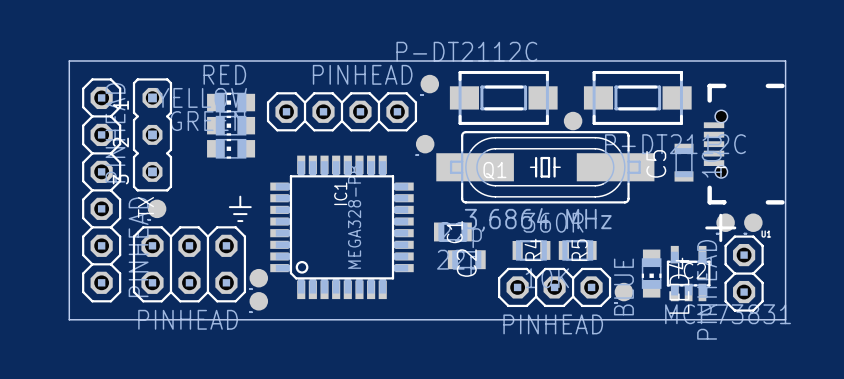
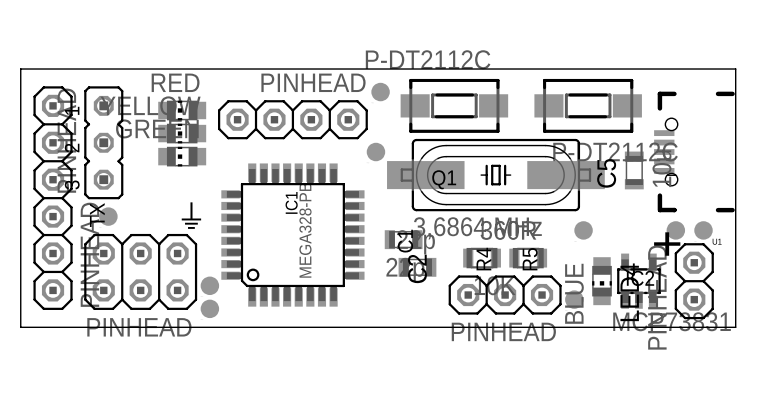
part position: (573, 121) -> (583, 230)

